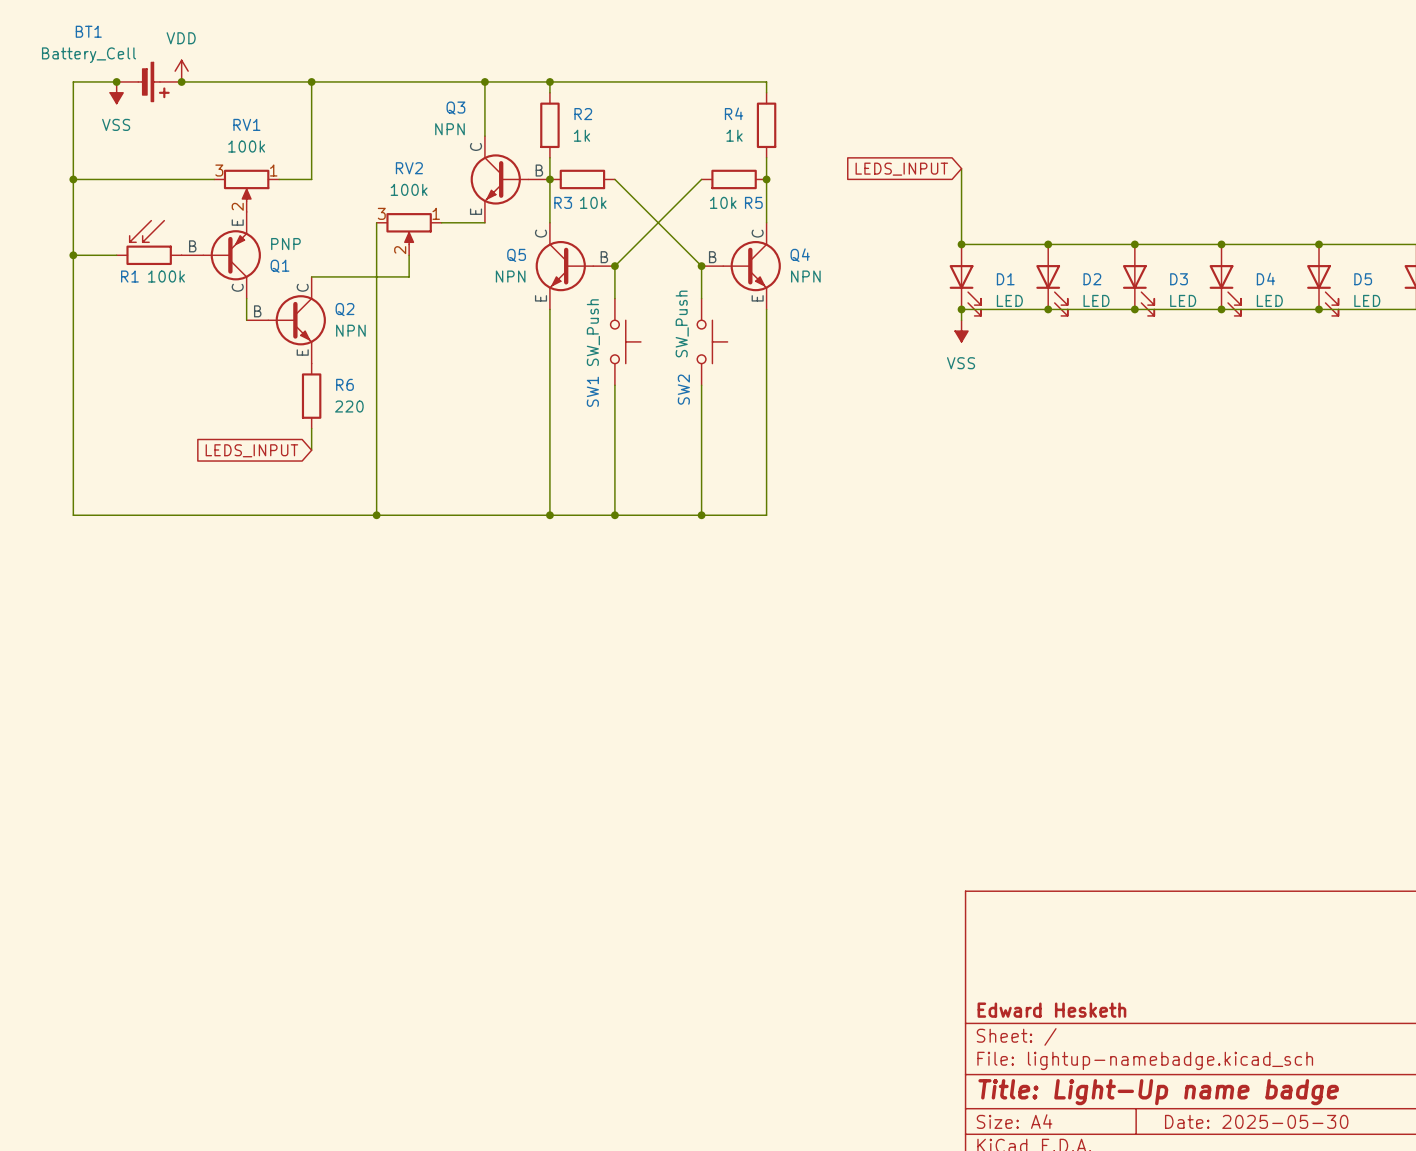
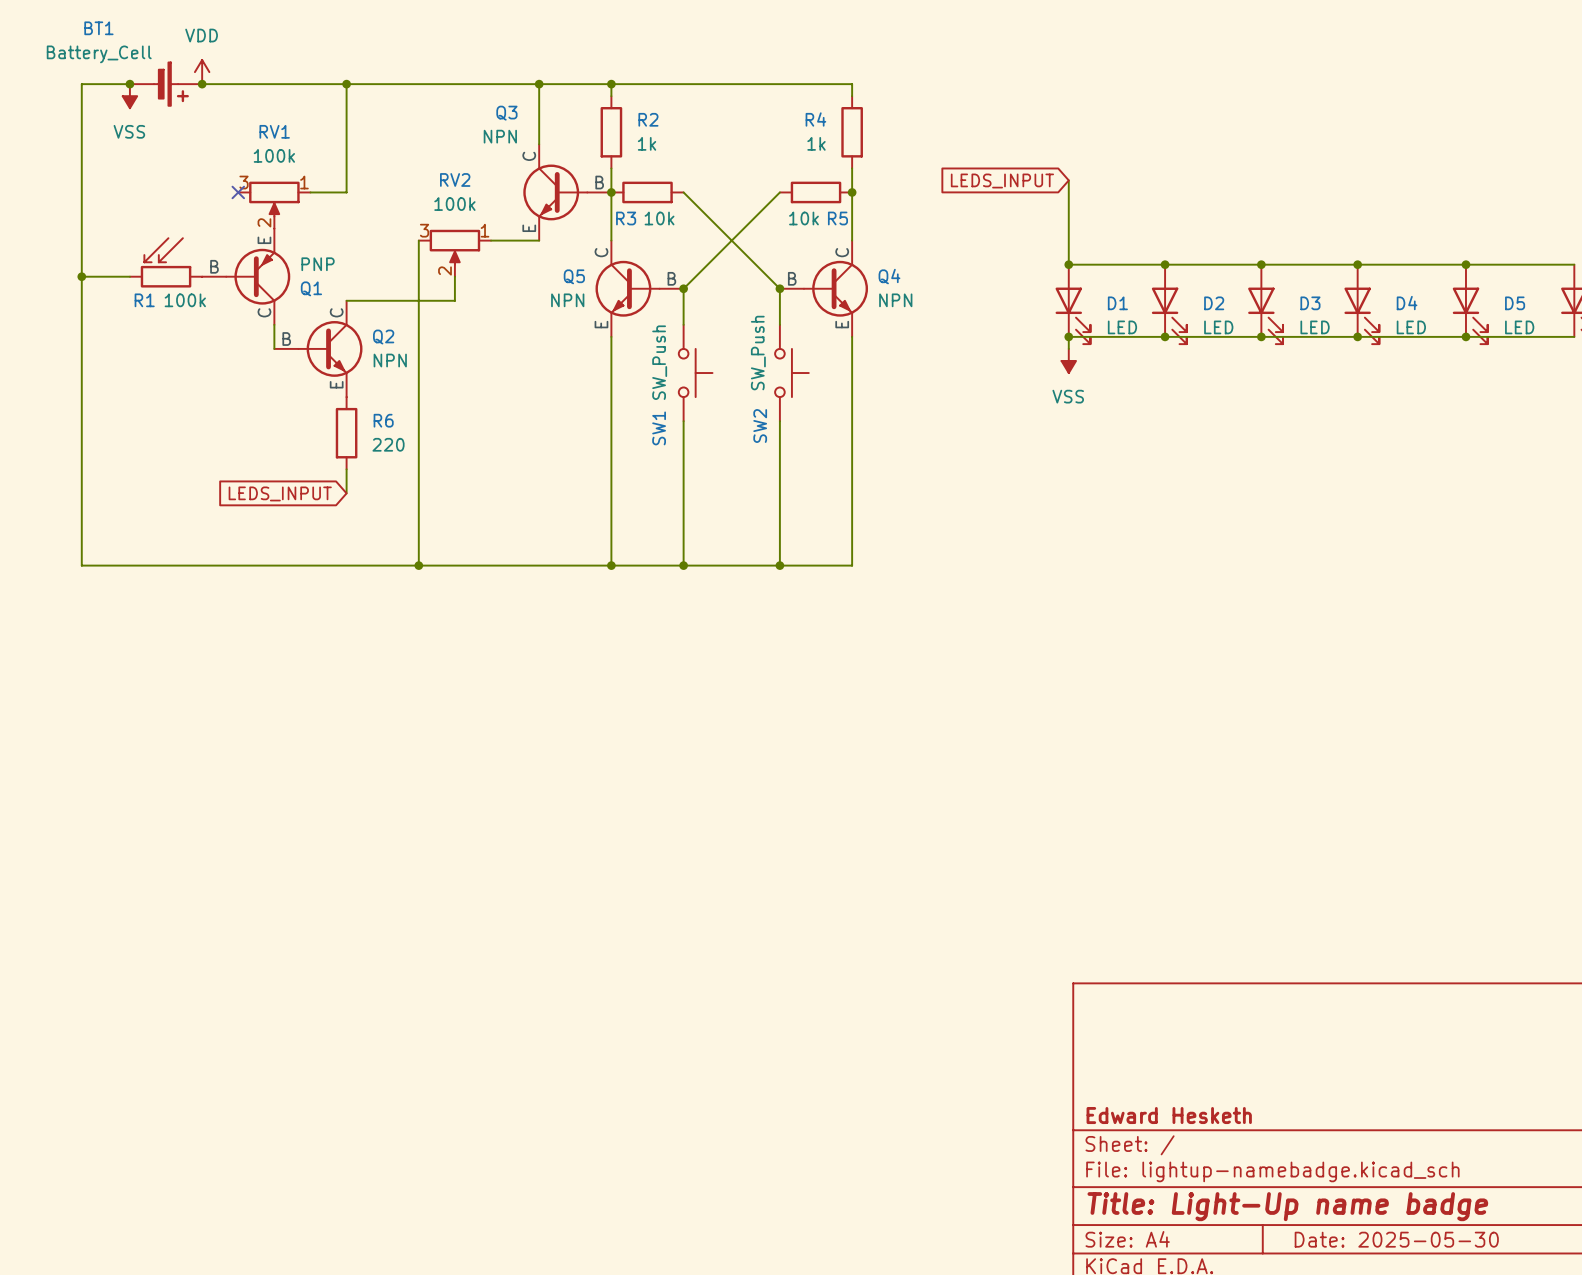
wire: (73, 179) (214, 179) -> none
junction: (73, 179) -> none
no-connect mark: none -> (238, 192)

